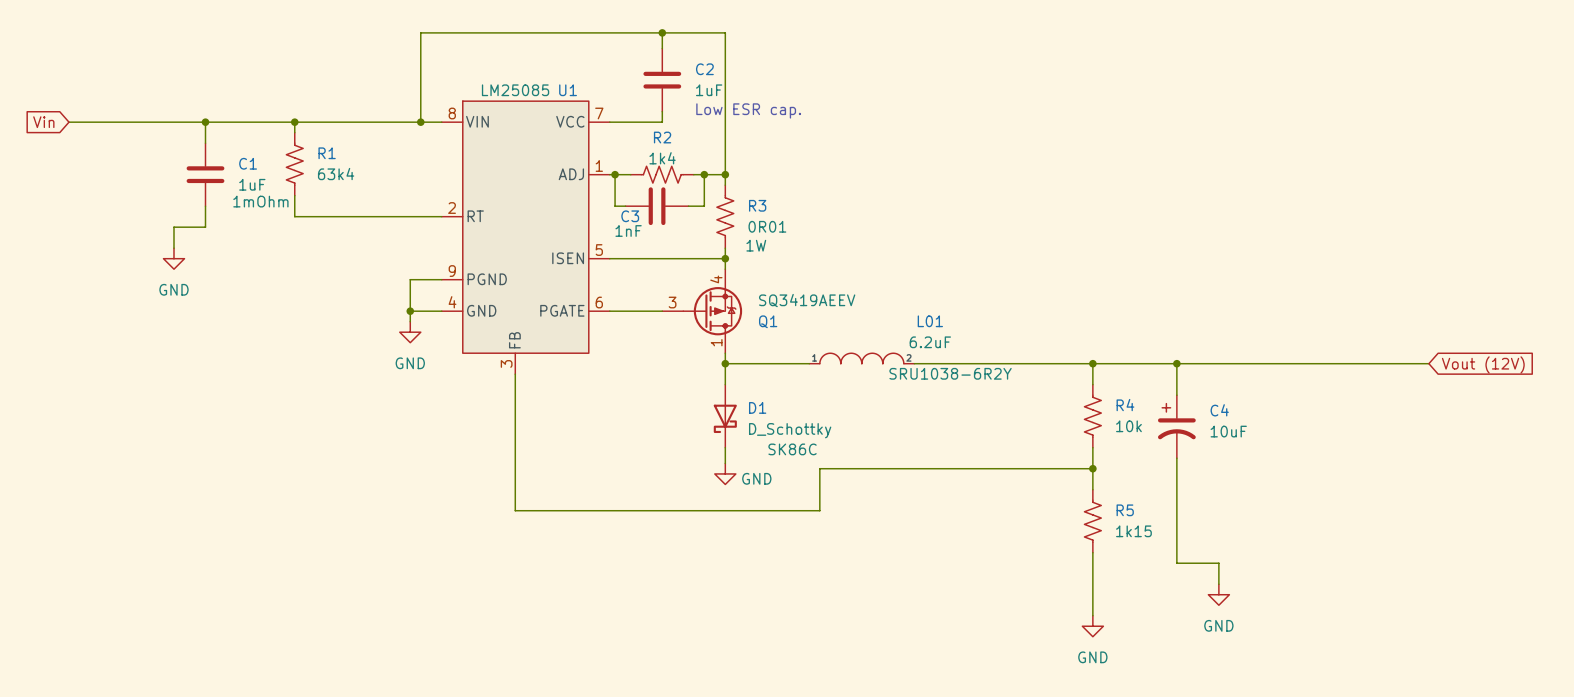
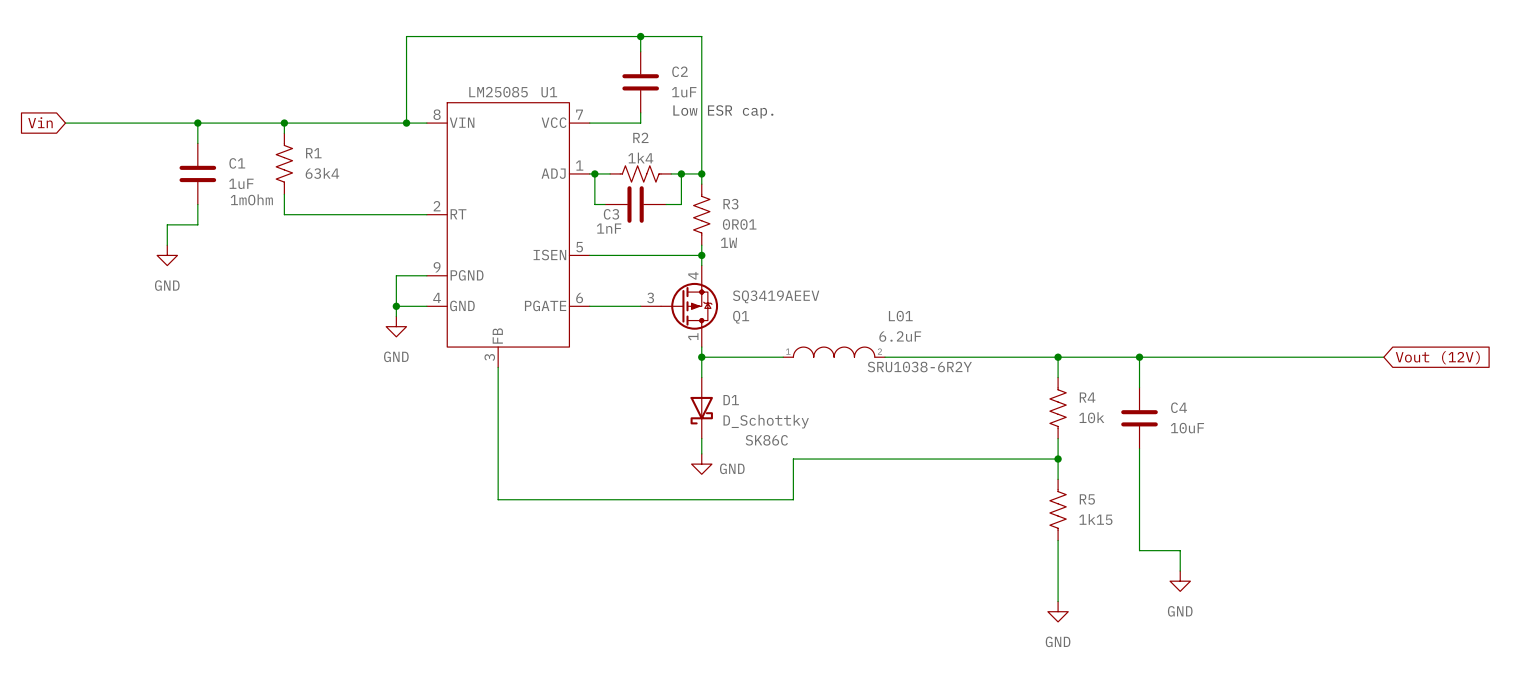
C4 symbol: [1157, 395, 1196, 459] -> [1121, 387, 1158, 449]

